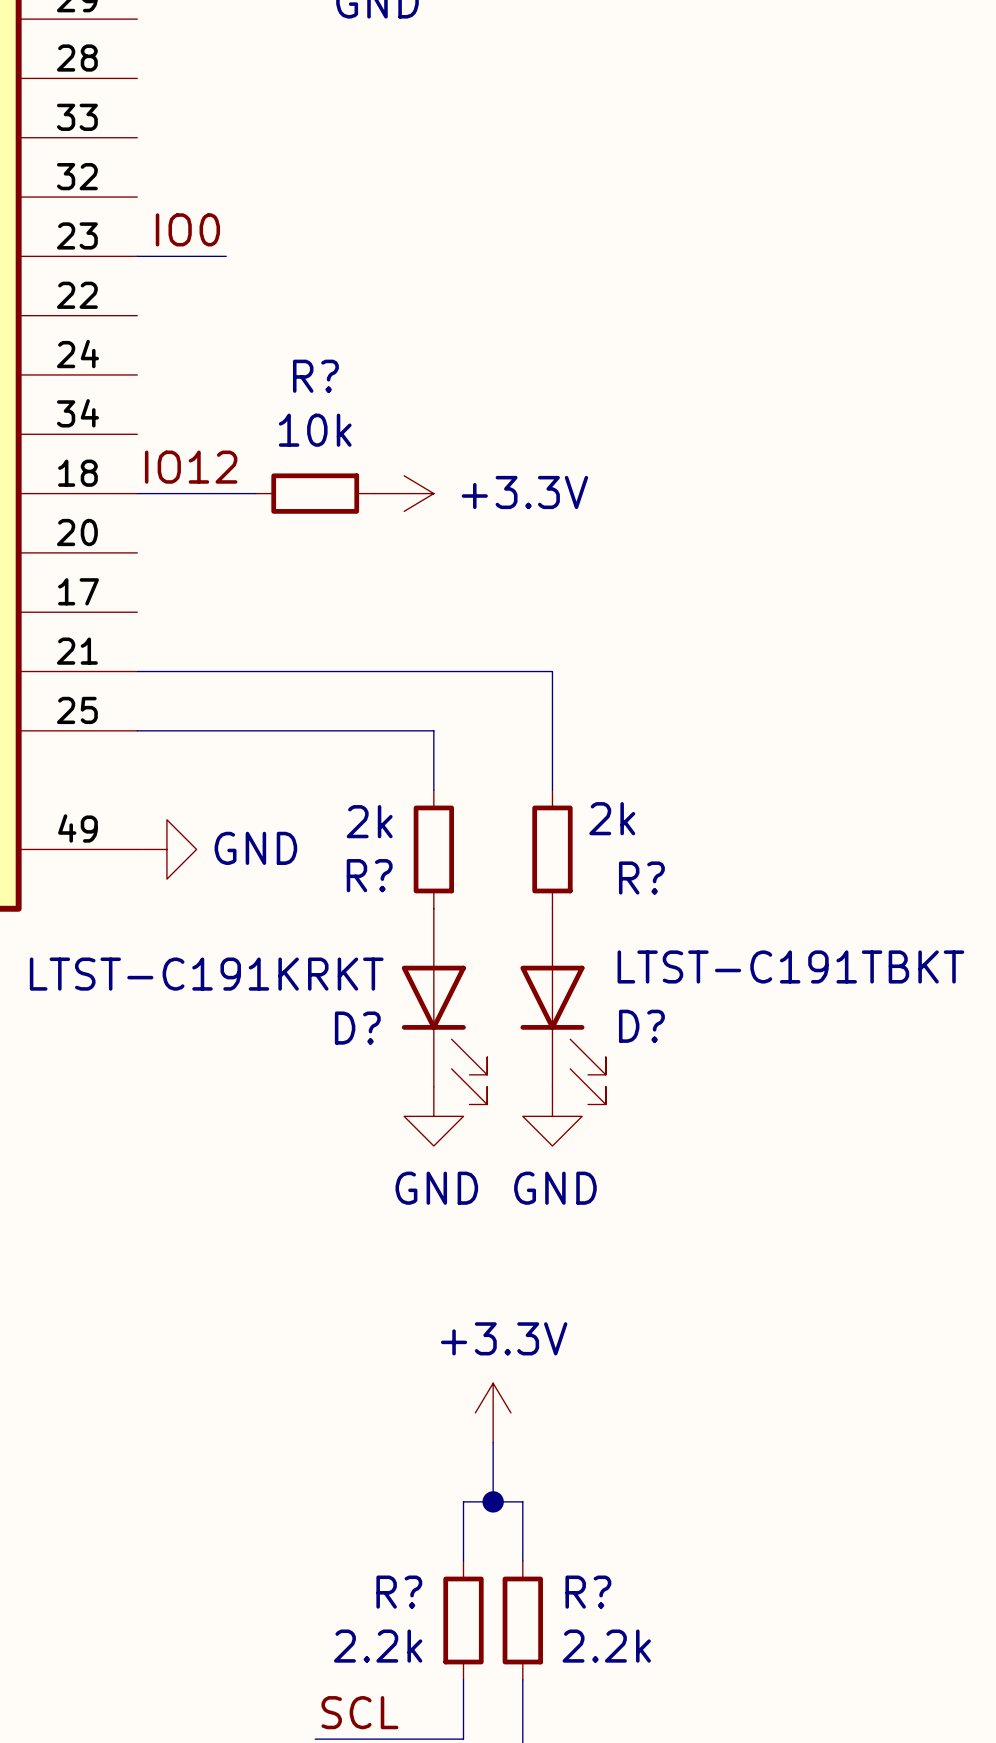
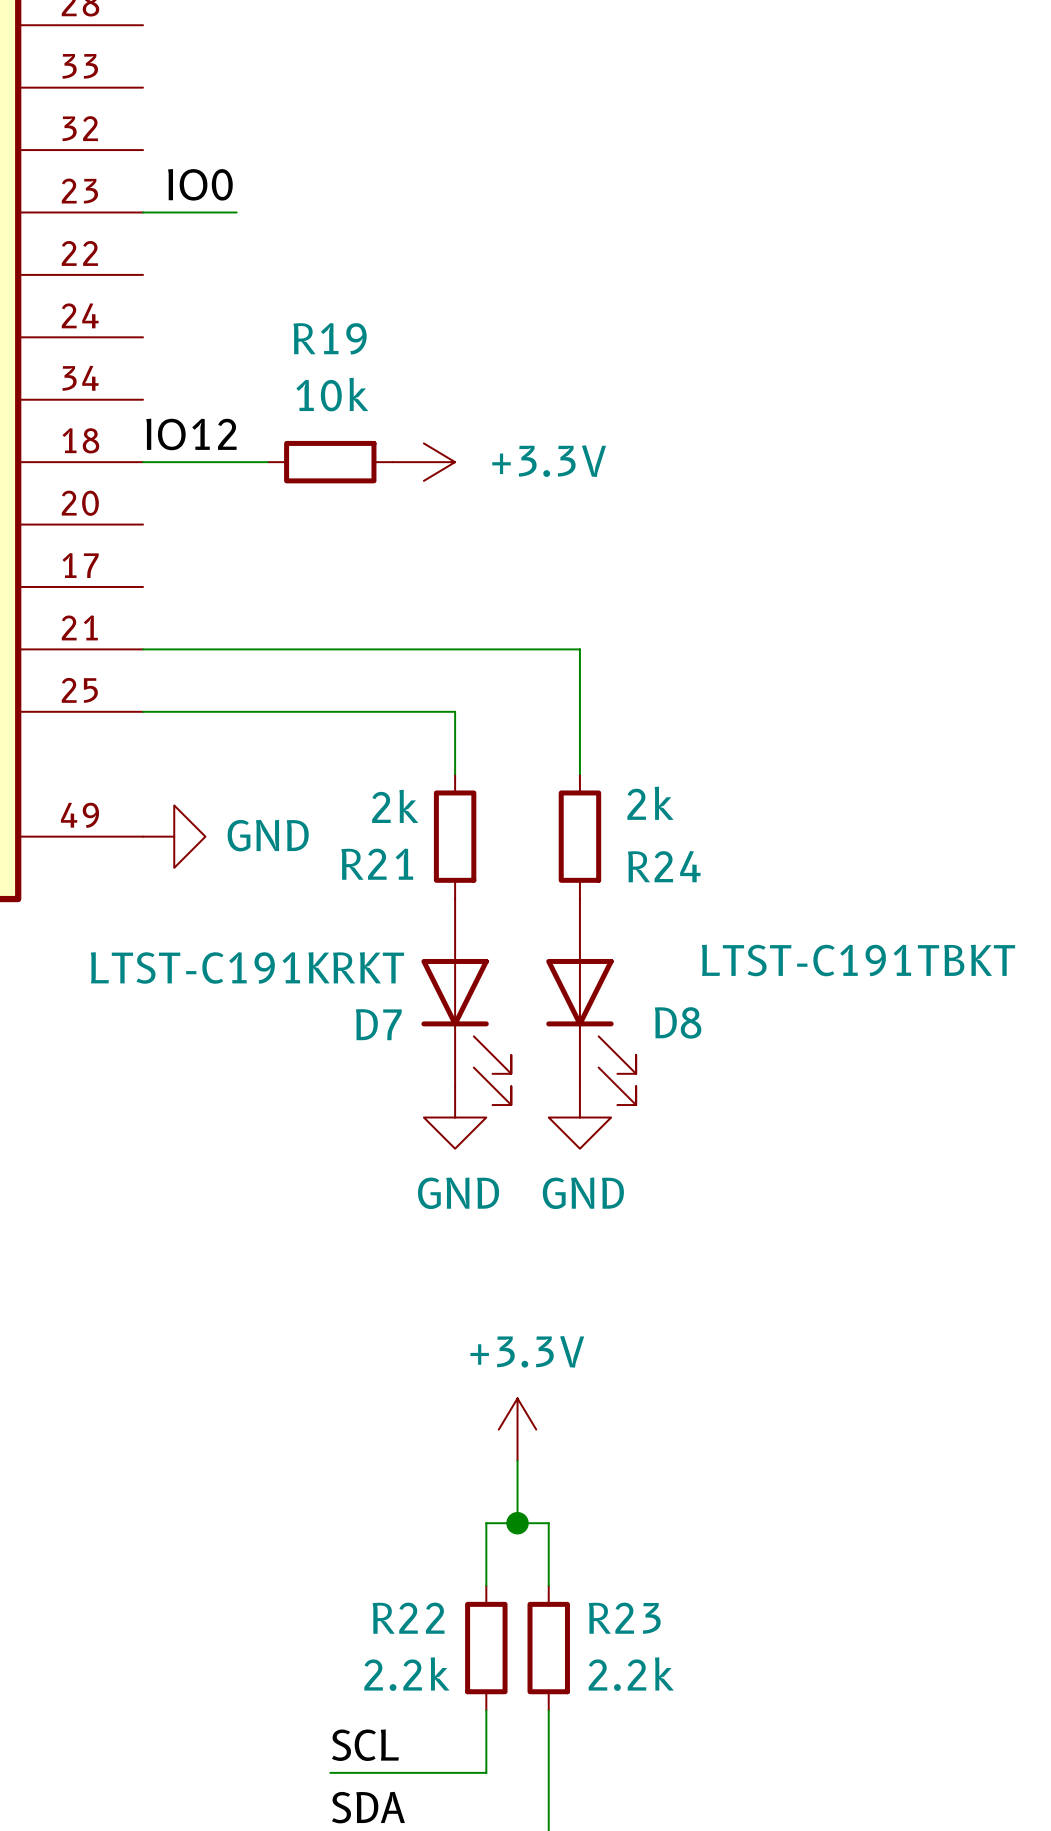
R? name: R? (315, 376) -> R19 (330, 338)
R? name: R? (369, 875) -> R21 (377, 864)
R? name: R? (641, 878) -> R24 (664, 866)
D? name: D? (641, 1026) -> D8 (678, 1022)
D? name: D? (357, 1028) -> D7 (378, 1024)
R? name: R? (399, 1592) -> R22 (408, 1618)
R? name: R? (588, 1592) -> R23 (624, 1618)

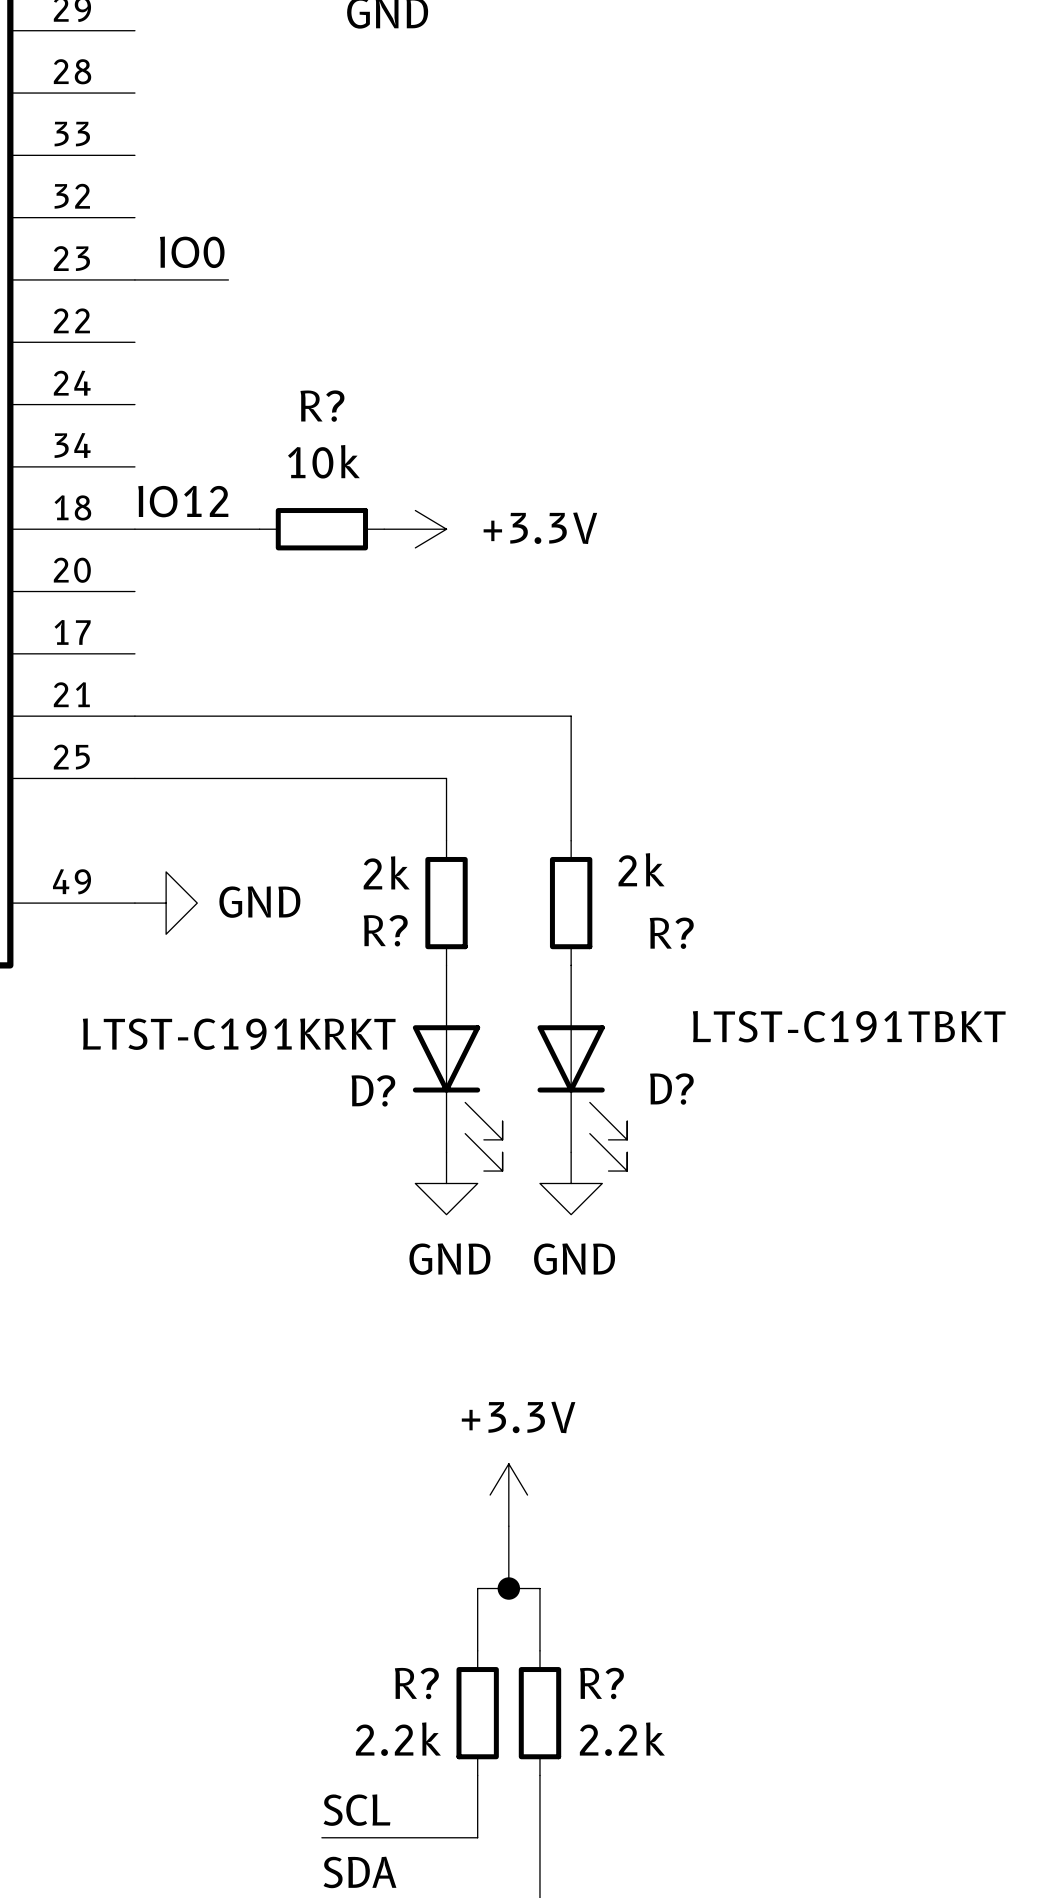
R19 name: R19 (330, 338) -> R? (322, 406)
R21 name: R21 (377, 864) -> R? (385, 930)
R24 name: R24 (664, 866) -> R? (671, 933)
D8 name: D8 (678, 1022) -> D? (671, 1089)
D7 name: D7 (378, 1024) -> D? (373, 1090)
R22 name: R22 (408, 1618) -> R? (416, 1683)
R23 name: R23 (624, 1618) -> R? (601, 1683)

